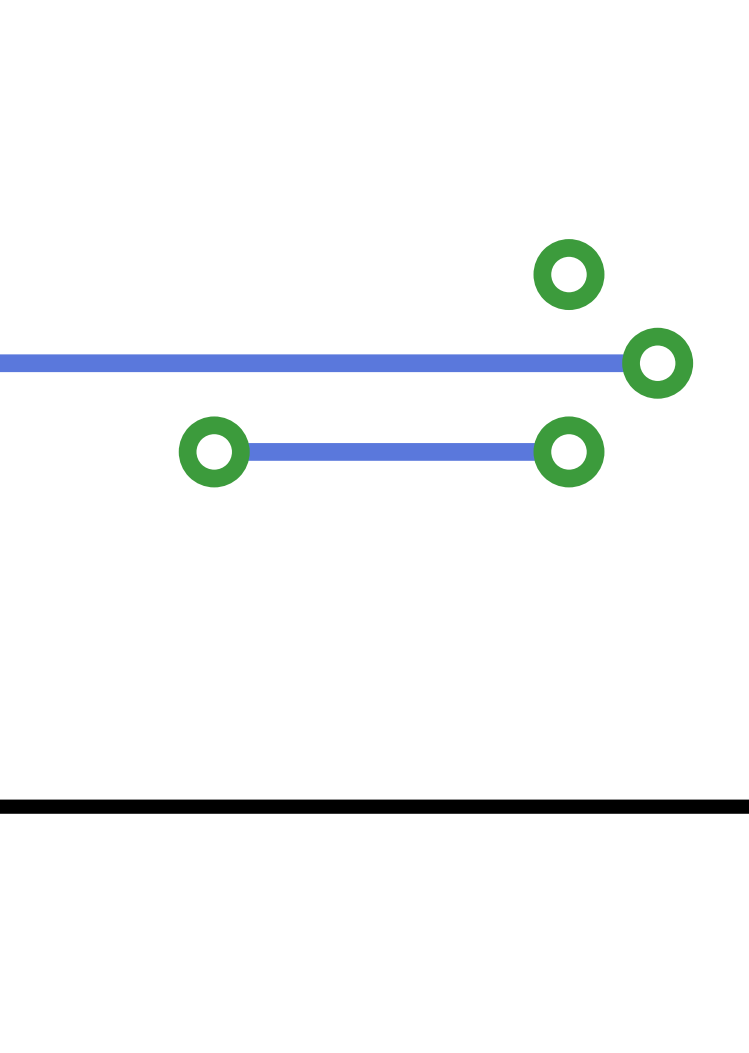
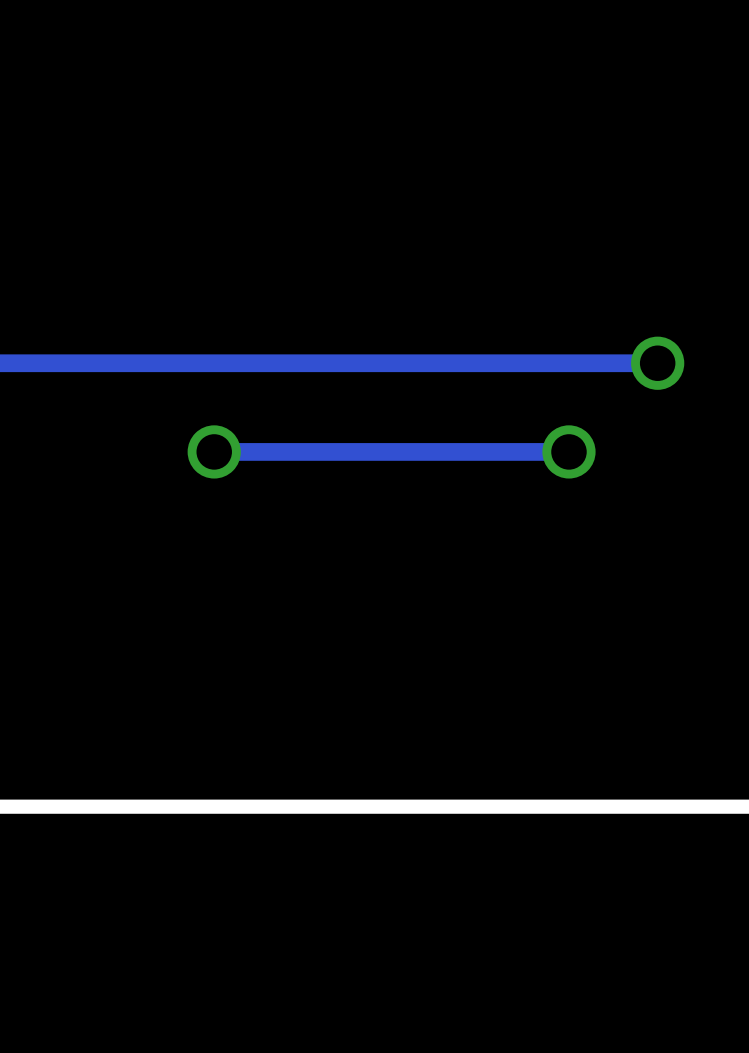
via: (568, 274) -> none
via size: [622, 327, 694, 399] -> [631, 336, 685, 390]
via size: [178, 416, 250, 488] -> [187, 425, 241, 479]
via size: [533, 416, 605, 488] -> [542, 425, 596, 479]

